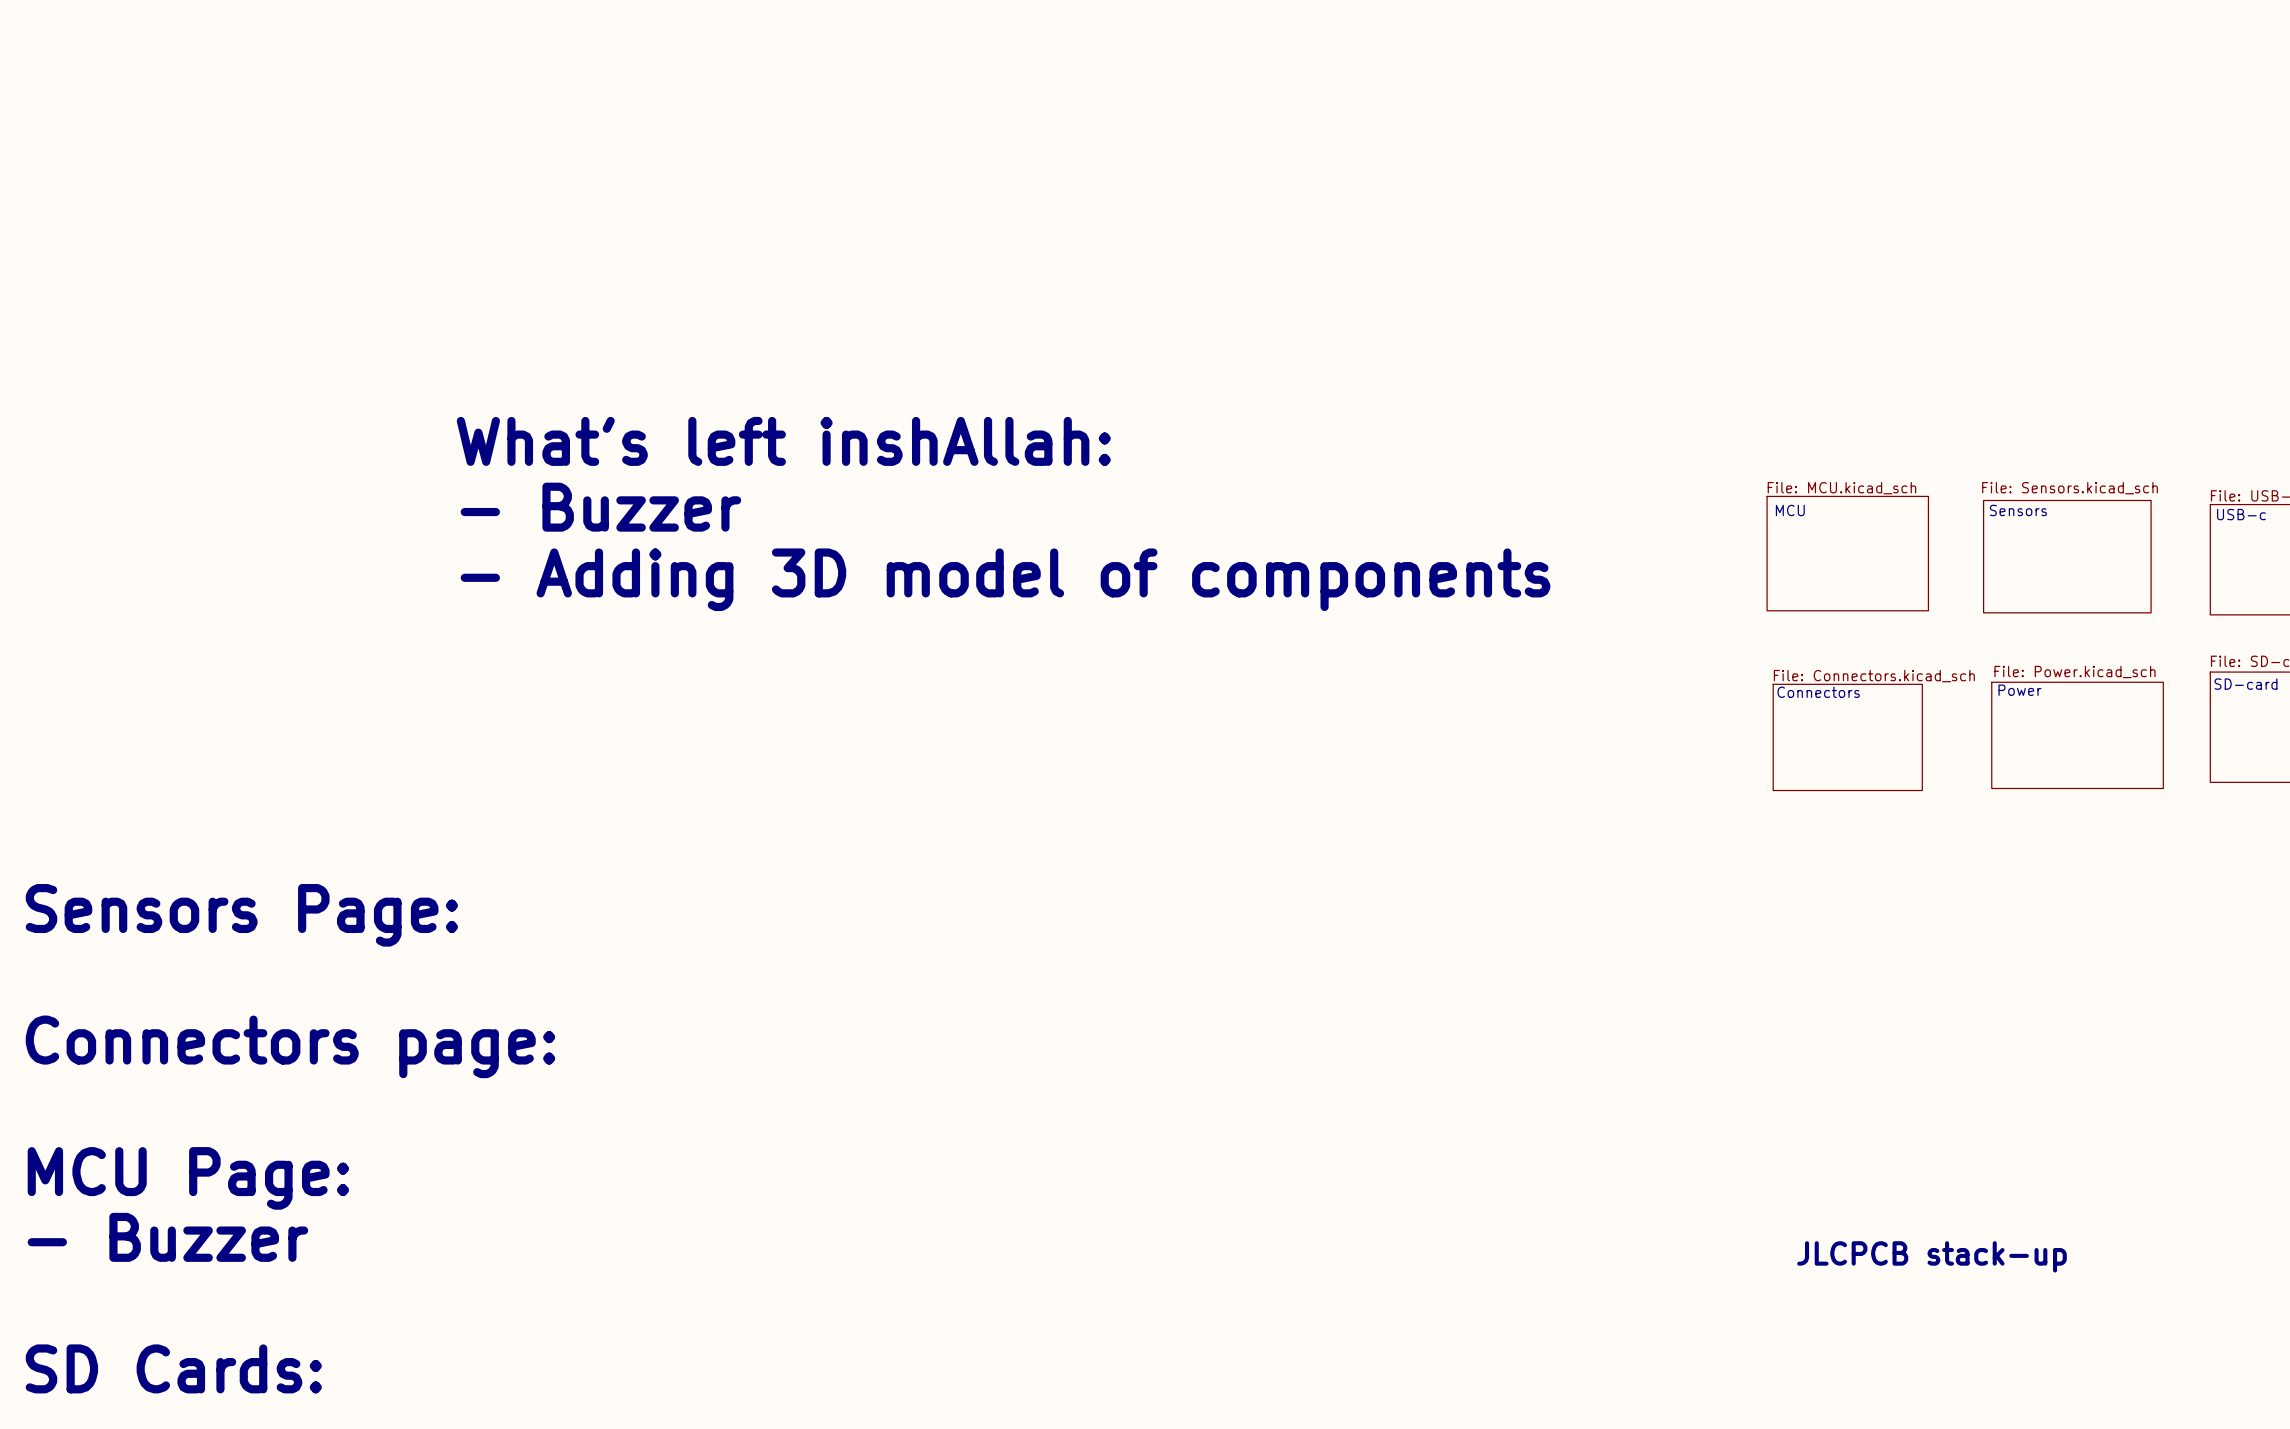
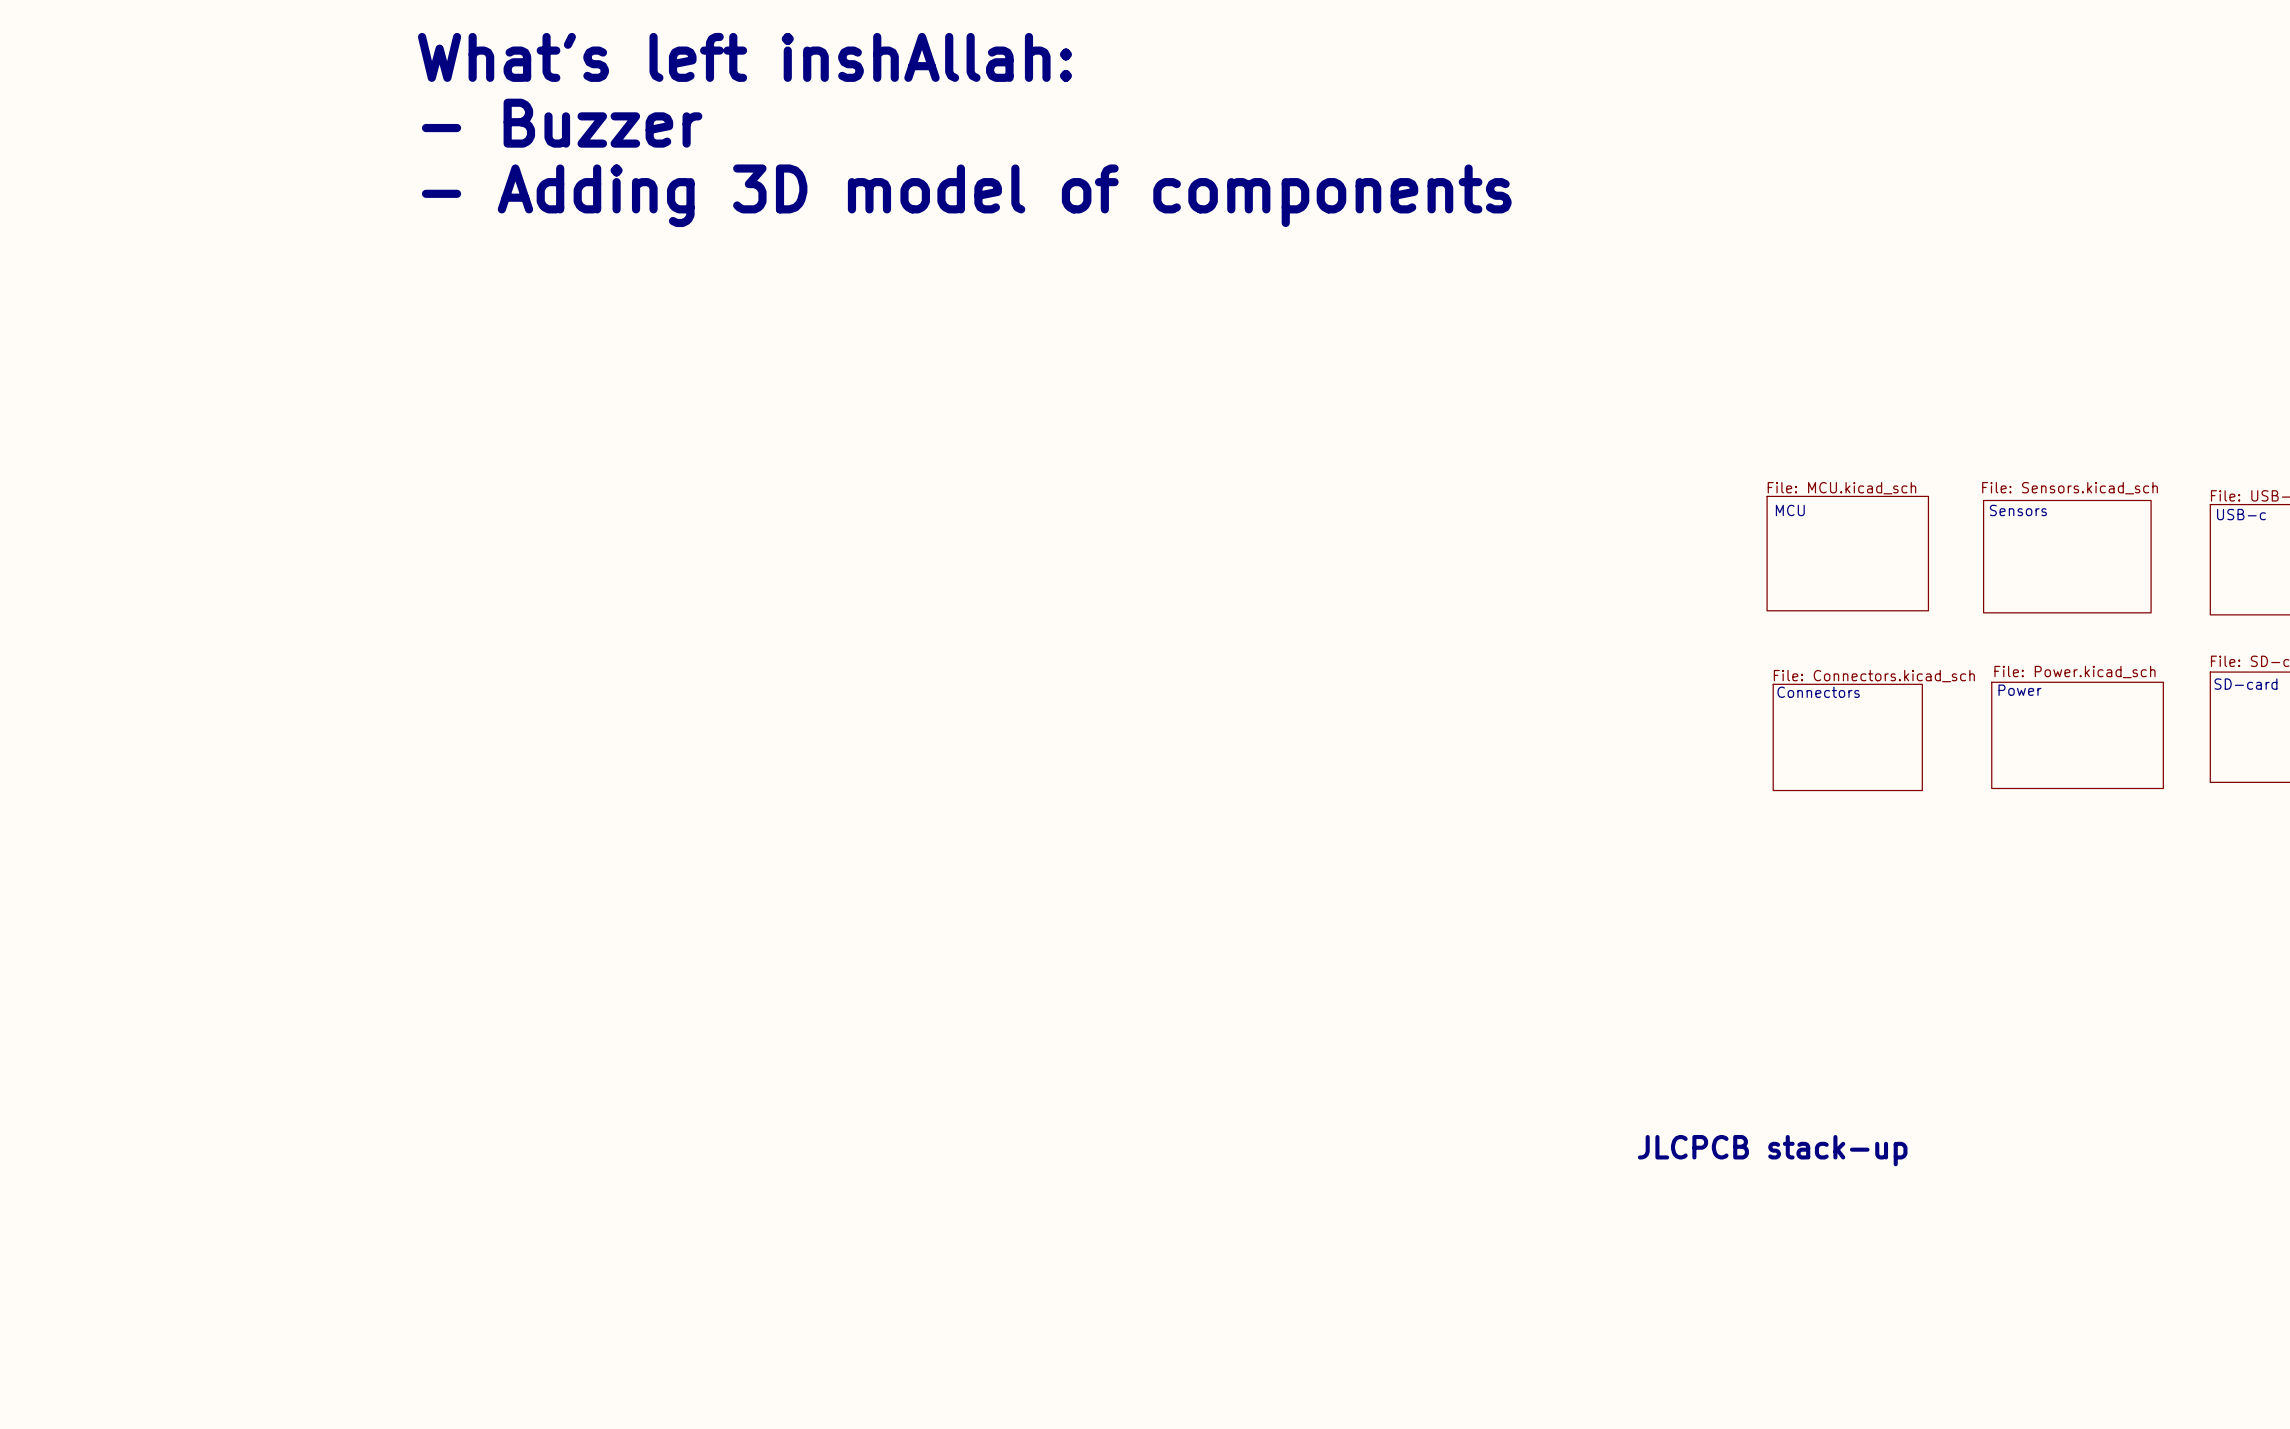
text: none -> What's left inshAllah: (744, 57)
text: none -> - Buzzer (562, 123)
text: none -> - Adding 3D model of components (966, 195)
text: What's left inshAllah: (783, 441) -> none
text: - Buzzer (600, 507) -> none
text: - Adding 3D model of components (1005, 579) -> none
text: Sensors Page: (241, 915) -> none
text: Connectors page: (290, 1046) -> none
text: MCU Page: (188, 1178) -> none
text: - Buzzer (167, 1237) -> none
text position: JLCPCB stack-up (1932, 1256) -> JLCPCB stack-up (1772, 1150)
text: SD Cards: (173, 1368) -> none

